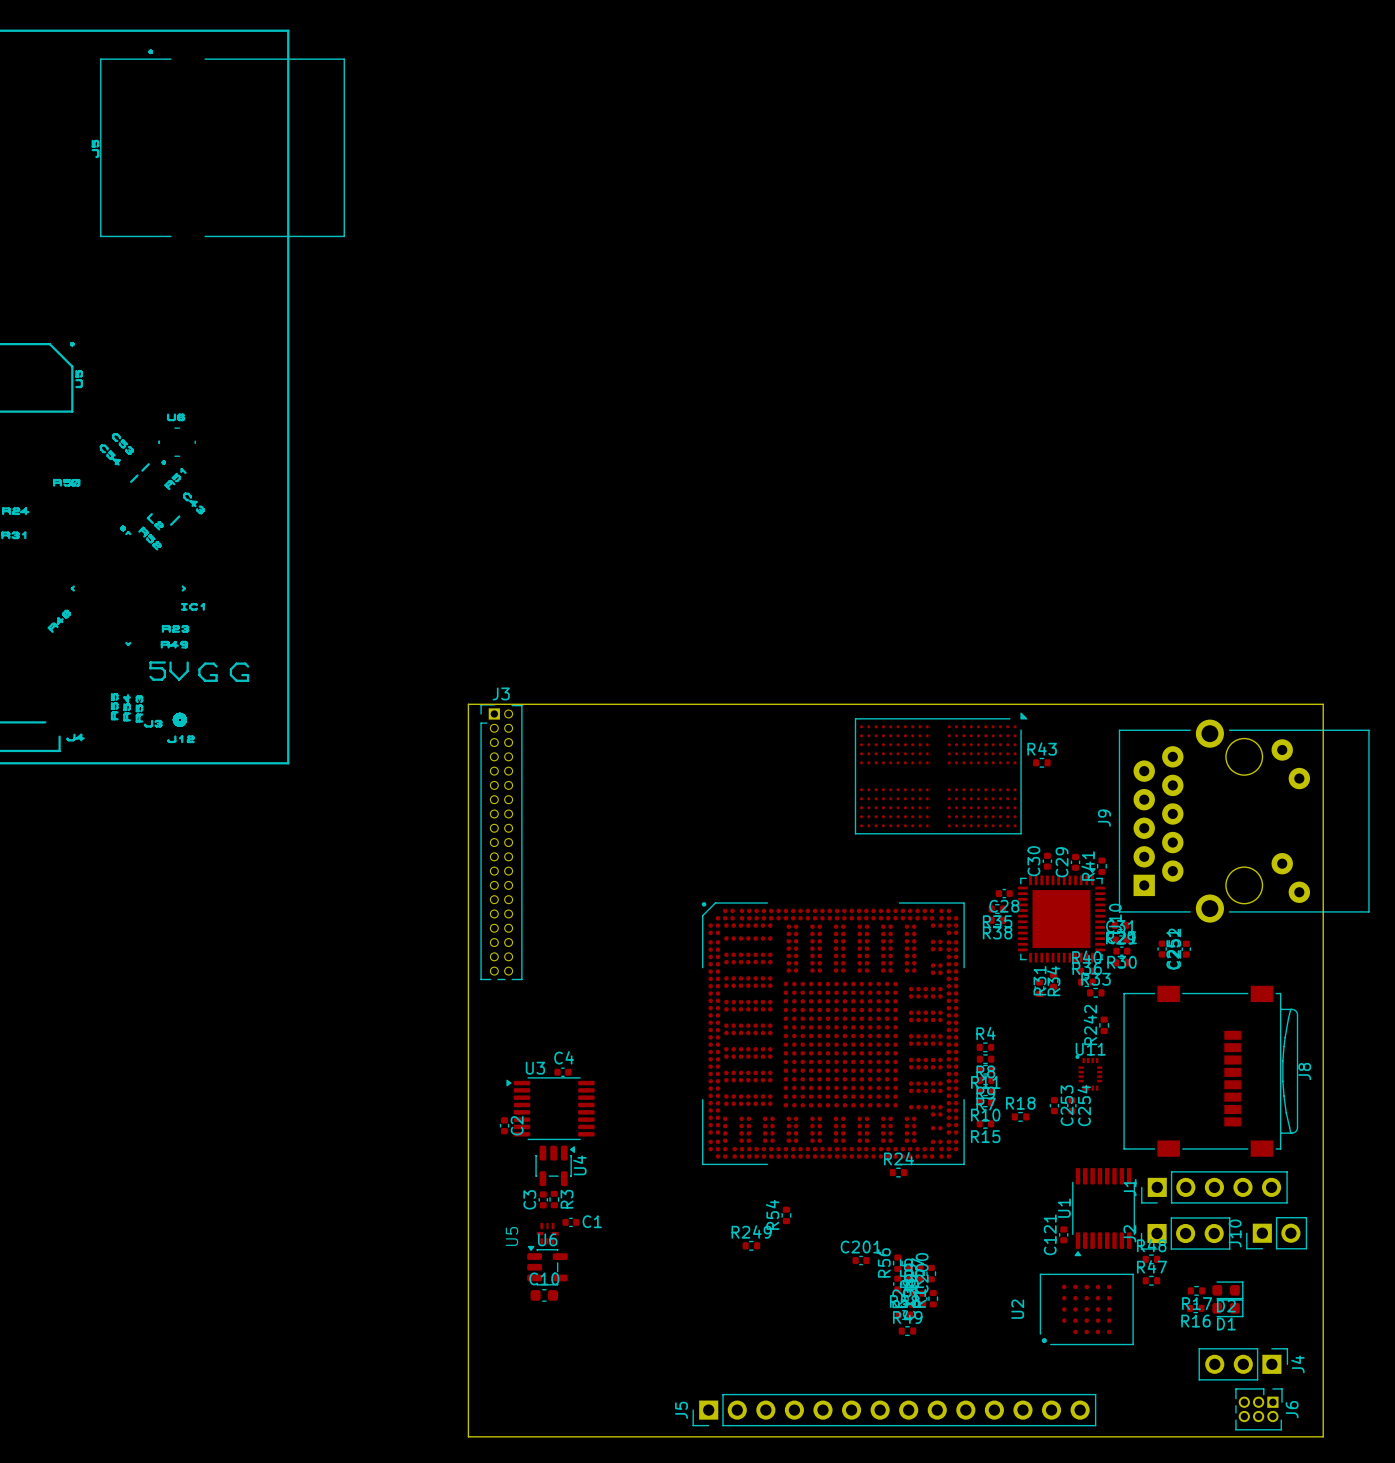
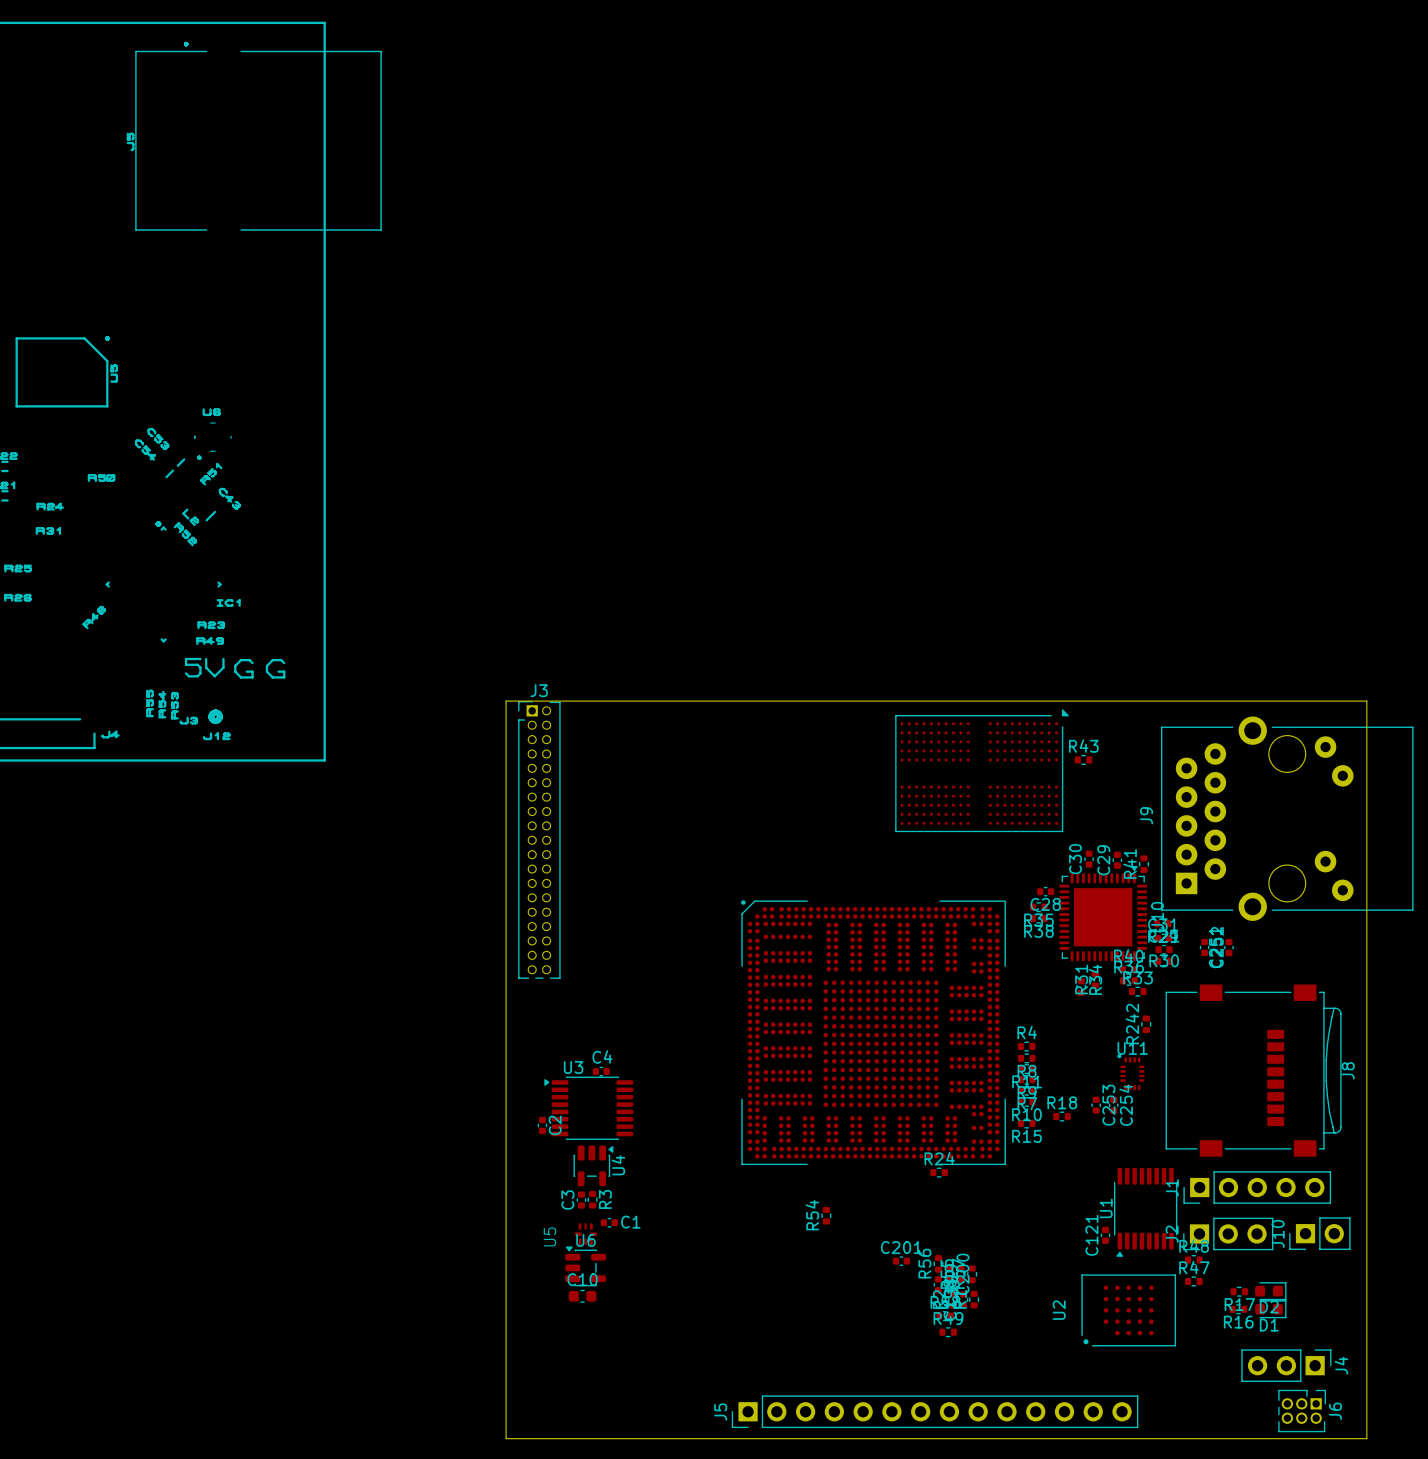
R249: (751, 1245) -> none

